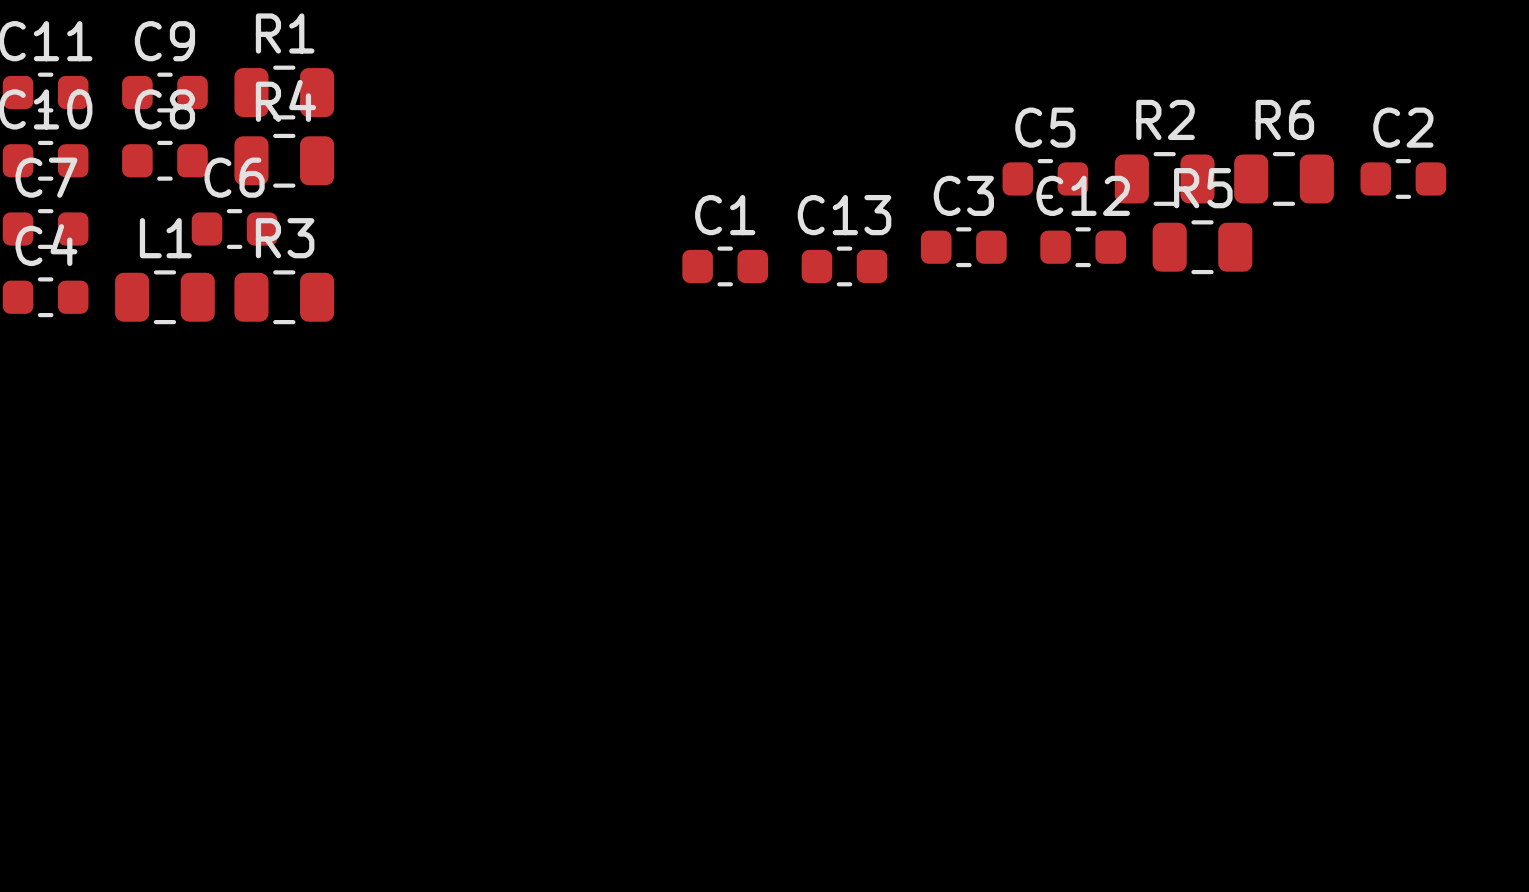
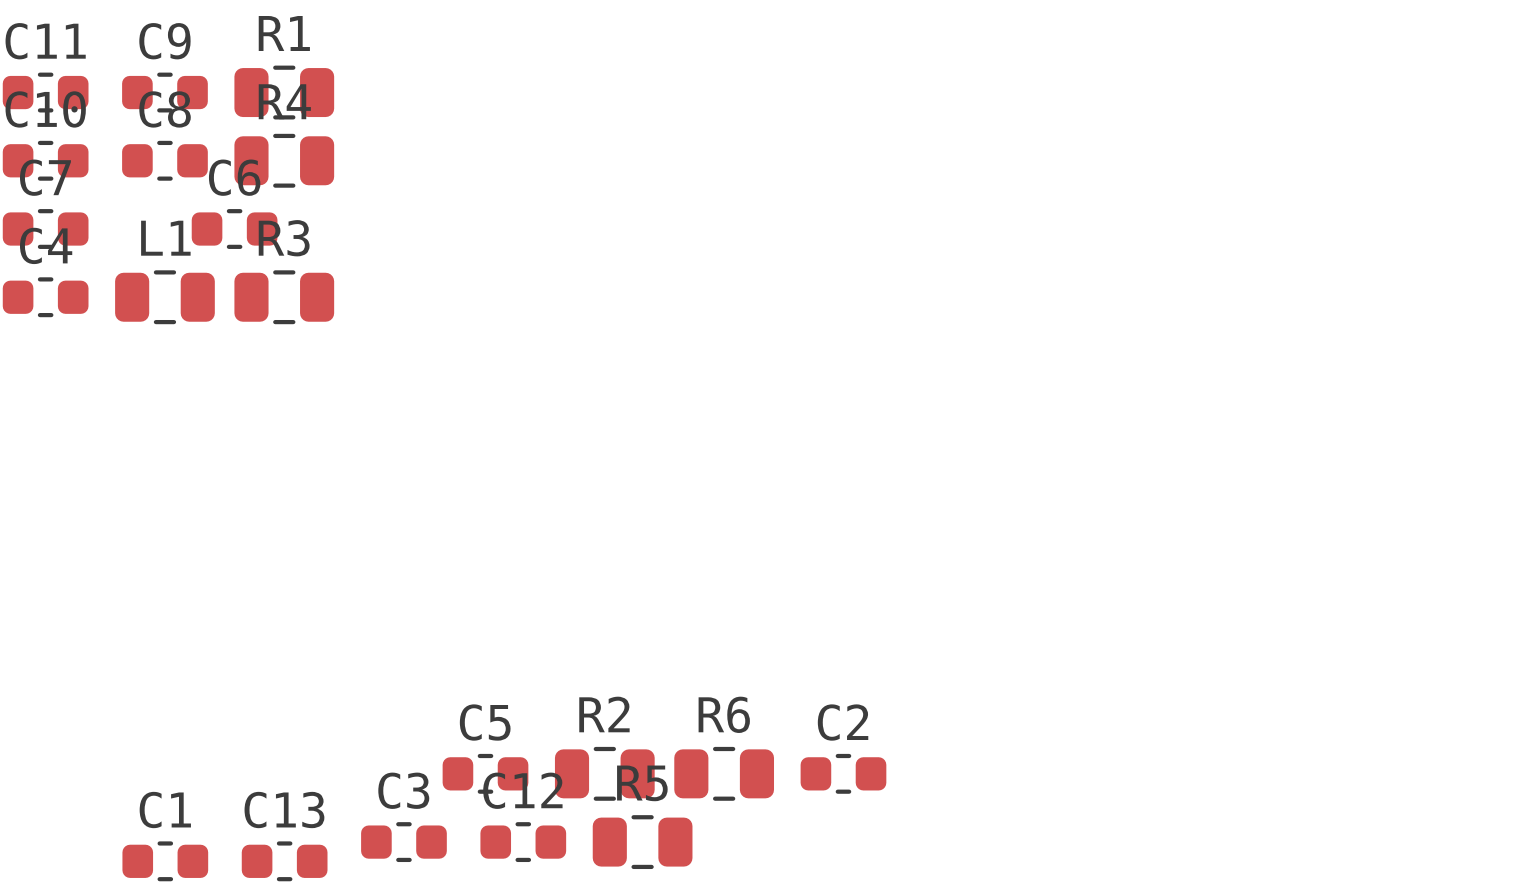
C5 position: (1045, 178) -> (485, 773)
R2 position: (1164, 178) -> (604, 773)
R6 position: (1284, 178) -> (724, 773)
C2 position: (1403, 178) -> (843, 773)
C3 position: (963, 247) -> (403, 842)
C12 position: (1083, 247) -> (523, 842)
R5 position: (1202, 247) -> (642, 842)
C1 position: (725, 266) -> (165, 861)
C13 position: (844, 266) -> (284, 861)

